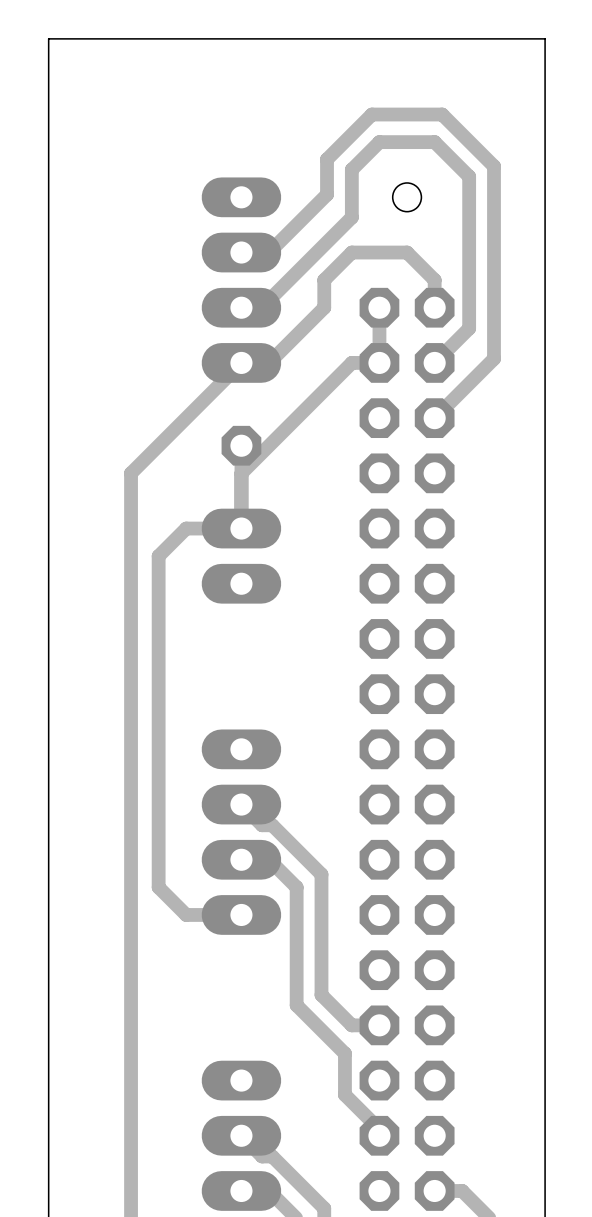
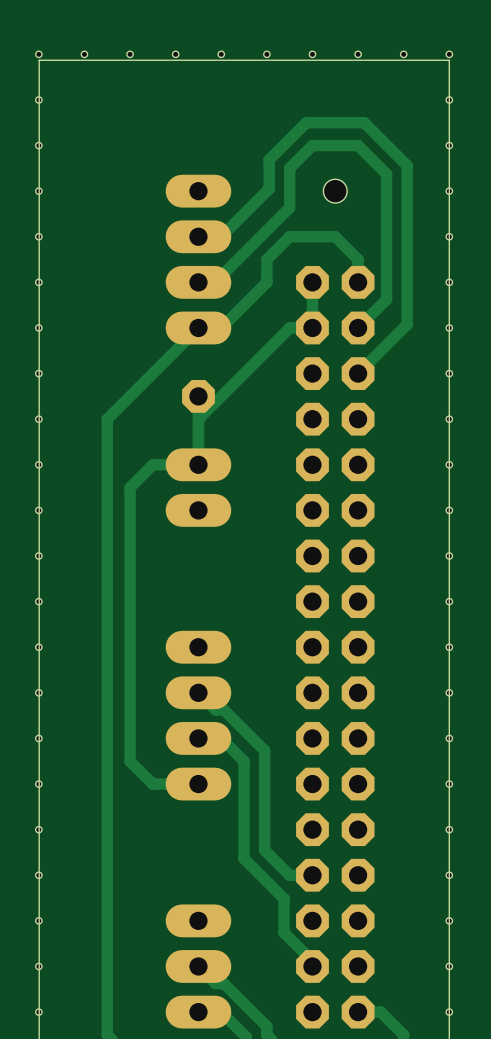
hole: none -> (38, 54)
hole: none -> (84, 54)
hole: none -> (130, 54)
hole: none -> (175, 54)
hole: none -> (221, 54)
hole: none -> (266, 54)
hole: none -> (312, 54)
hole: none -> (358, 54)
hole: none -> (403, 54)
hole: none -> (449, 54)
hole: none -> (38, 99)
hole: none -> (449, 99)
hole: none -> (38, 145)
hole: none -> (449, 145)
hole: none -> (38, 191)
hole: none -> (449, 191)
hole: none -> (38, 236)
hole: none -> (449, 236)
hole: none -> (38, 282)
hole: none -> (449, 282)
hole: none -> (38, 327)
hole: none -> (449, 327)
hole: none -> (38, 373)
hole: none -> (449, 373)
hole: none -> (38, 419)
hole: none -> (449, 419)
hole: none -> (38, 464)
hole: none -> (449, 464)
hole: none -> (38, 510)
hole: none -> (449, 510)
hole: none -> (38, 556)
hole: none -> (449, 556)
hole: none -> (38, 601)
hole: none -> (449, 601)
hole: none -> (38, 647)
hole: none -> (449, 647)
hole: none -> (38, 692)
hole: none -> (449, 692)
hole: none -> (38, 738)
hole: none -> (449, 738)
hole: none -> (38, 784)
hole: none -> (449, 784)
hole: none -> (38, 829)
hole: none -> (449, 829)
hole: none -> (38, 875)
hole: none -> (449, 875)
hole: none -> (38, 920)
hole: none -> (449, 920)
hole: none -> (38, 966)
hole: none -> (449, 966)
hole: none -> (38, 1012)
hole: none -> (449, 1012)

